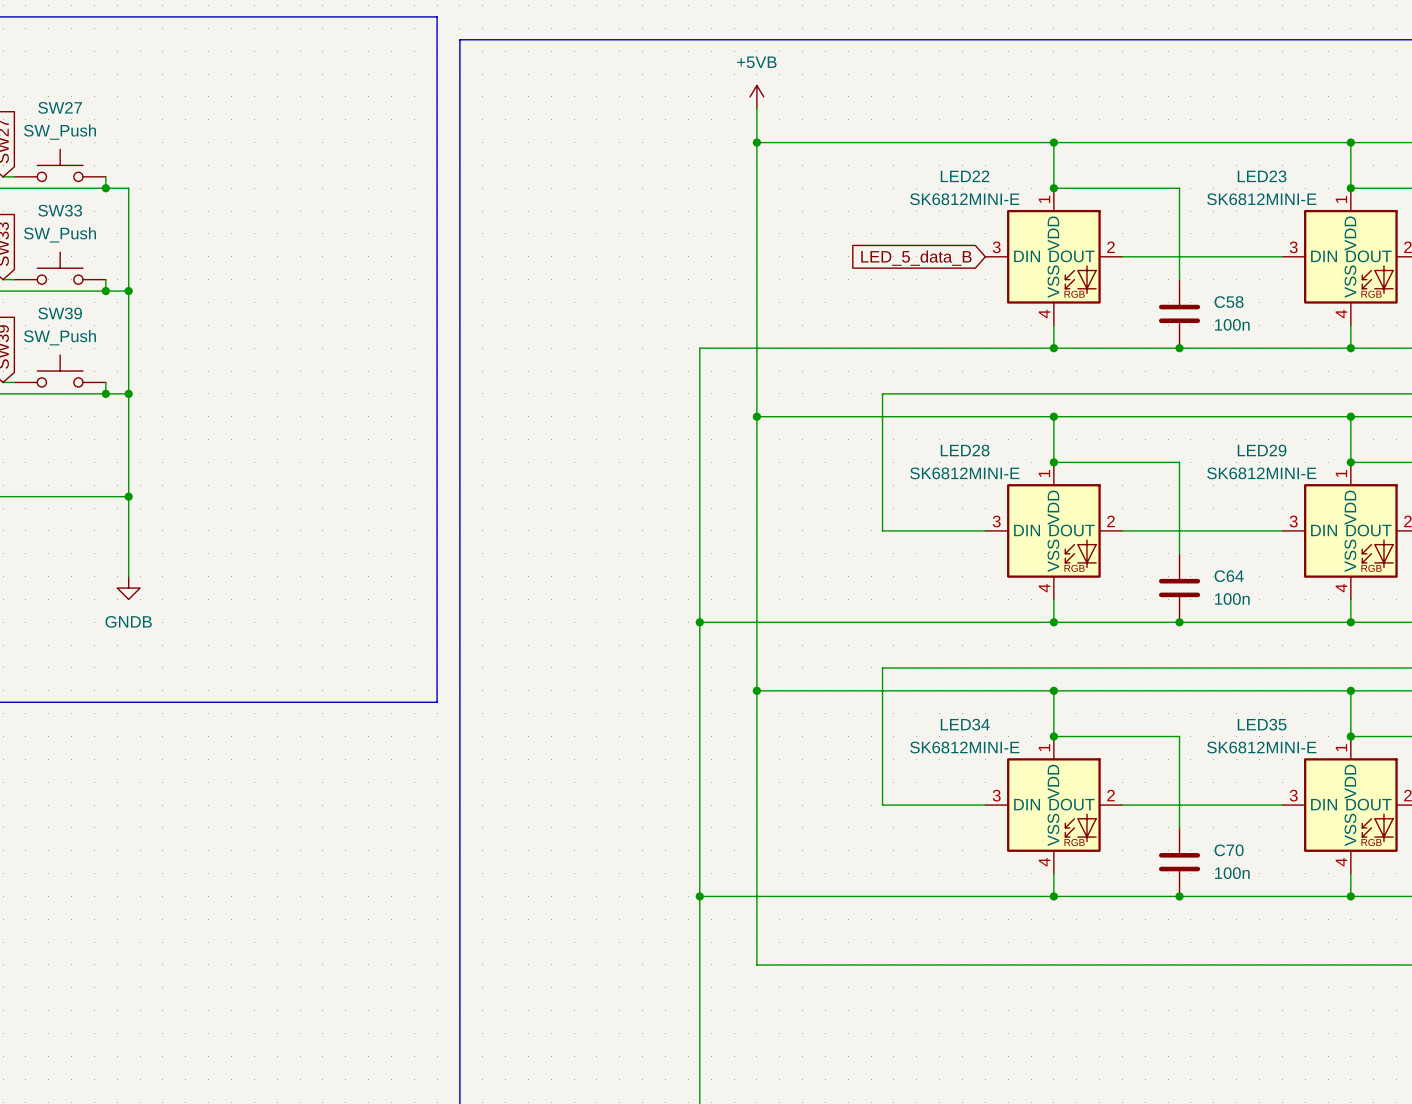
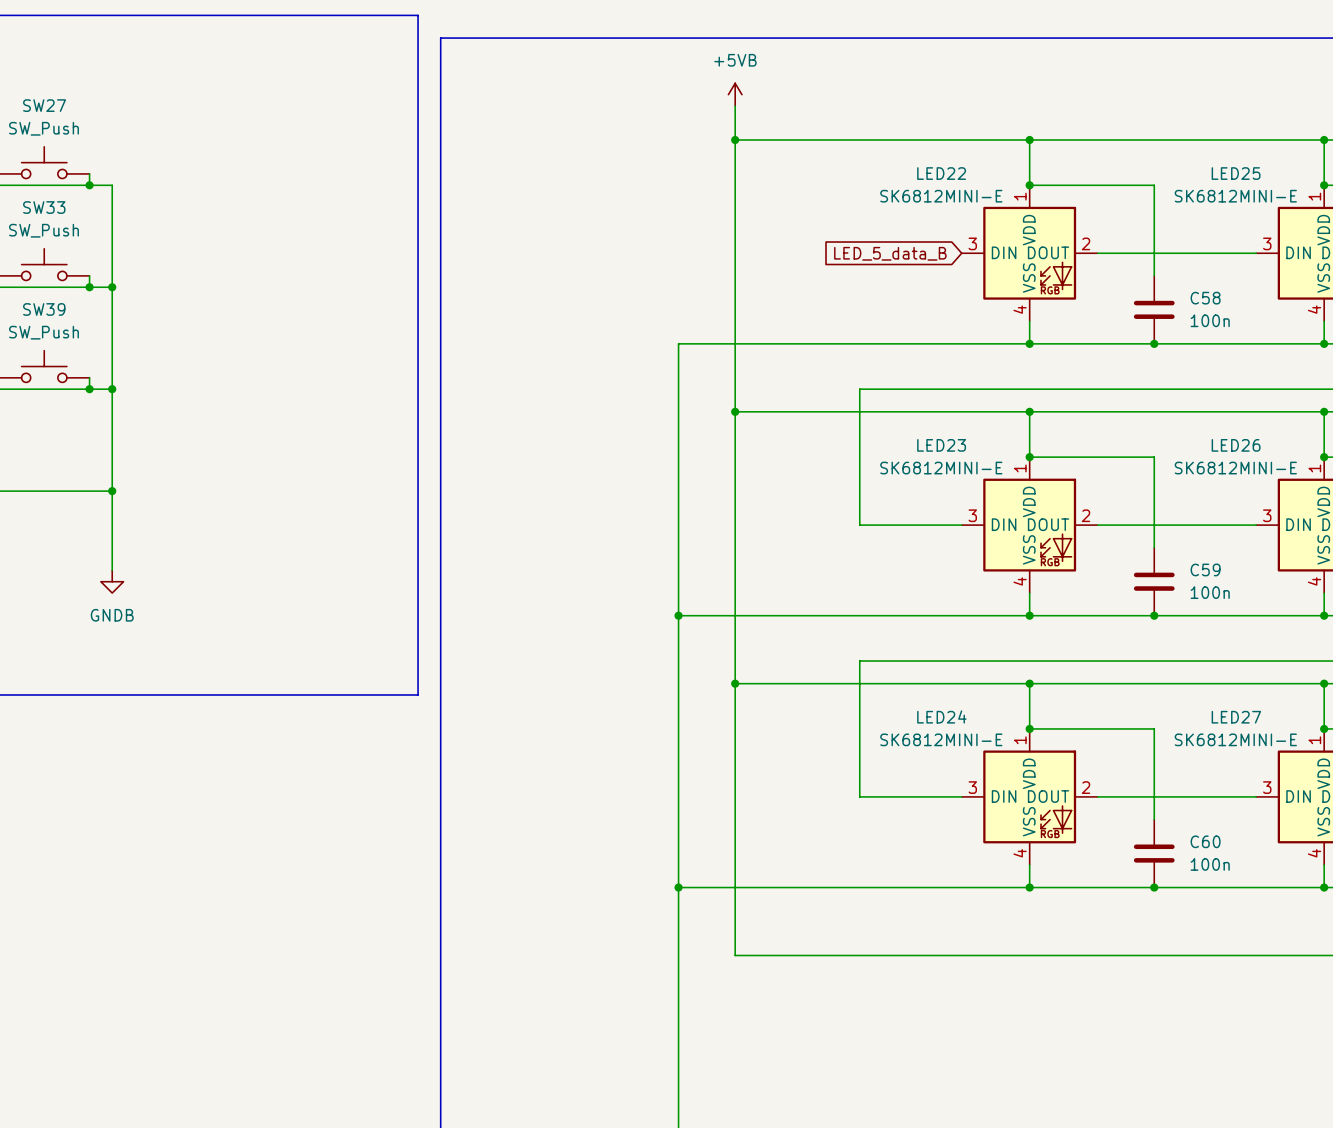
LED23 name: LED23 (1262, 176) -> LED25 (1236, 173)
LED28 name: LED28 (965, 450) -> LED23 (941, 445)
LED29 name: LED29 (1262, 450) -> LED26 (1236, 445)
C64 name: C64 (1229, 576) -> C59 (1205, 569)
LED34 name: LED34 (965, 724) -> LED24 (941, 716)
LED35 name: LED35 (1262, 724) -> LED27 (1236, 717)
C70 name: C70 (1229, 850) -> C60 (1205, 841)

